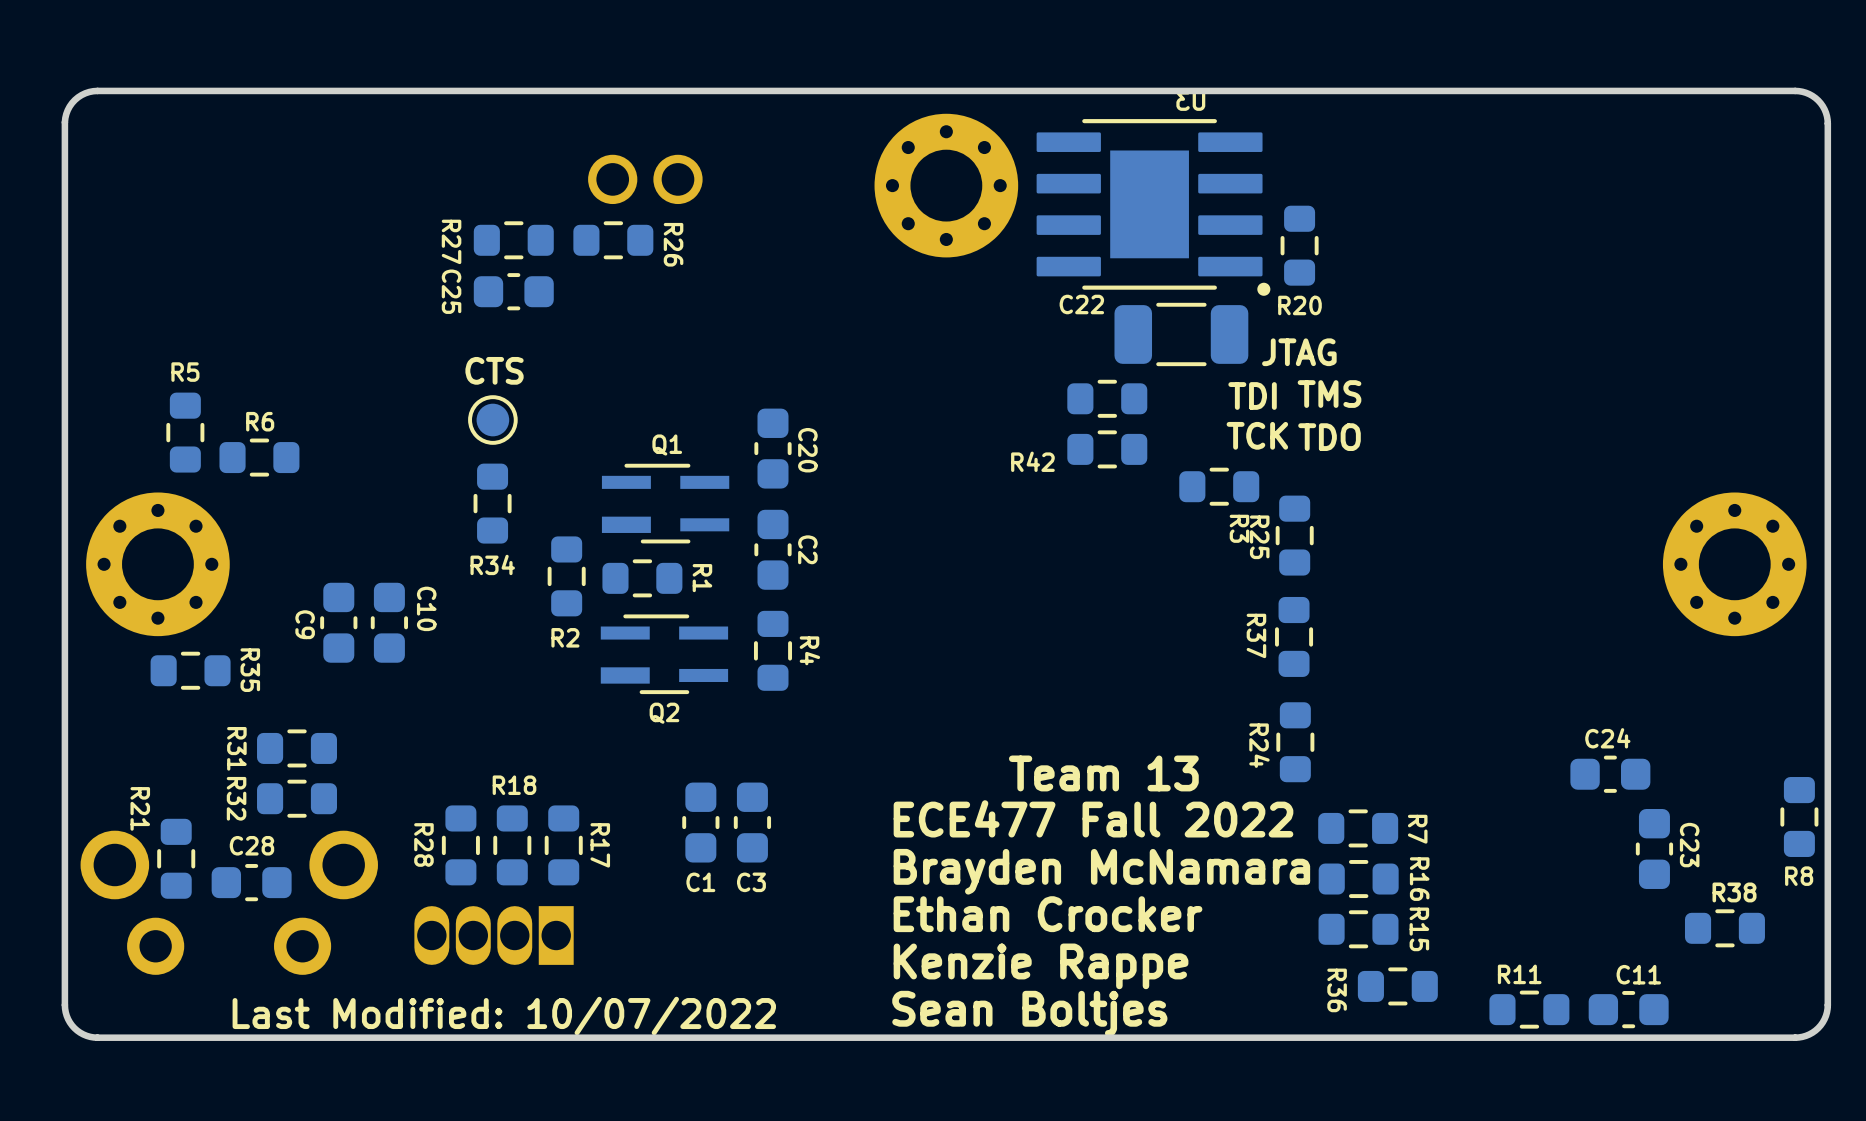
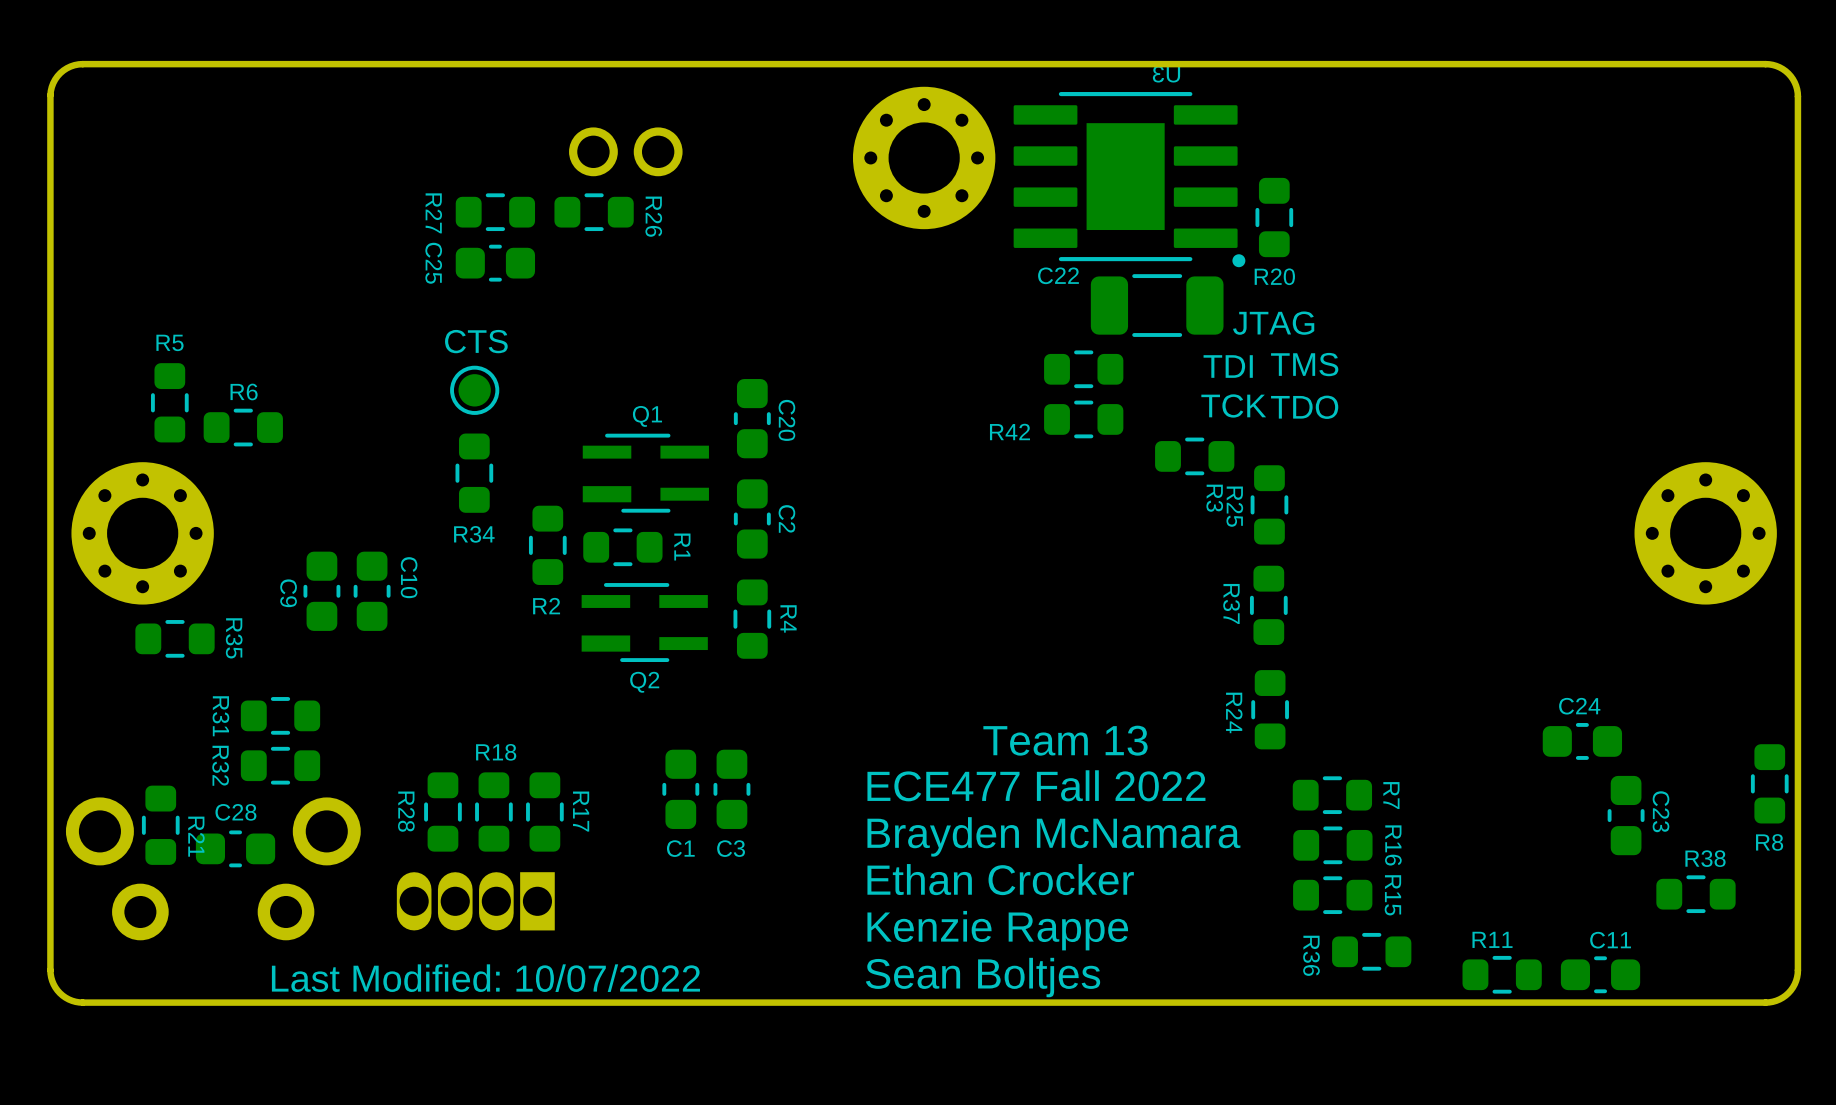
R21 name position: R21 (140, 808) -> R21 (196, 836)

